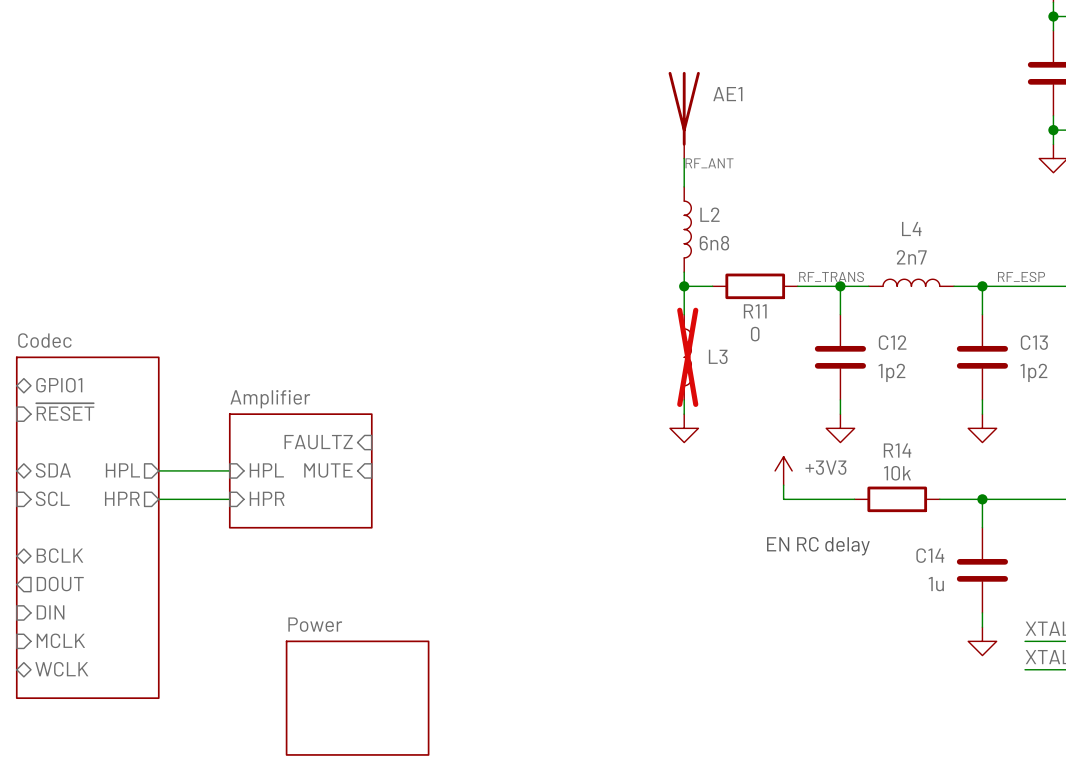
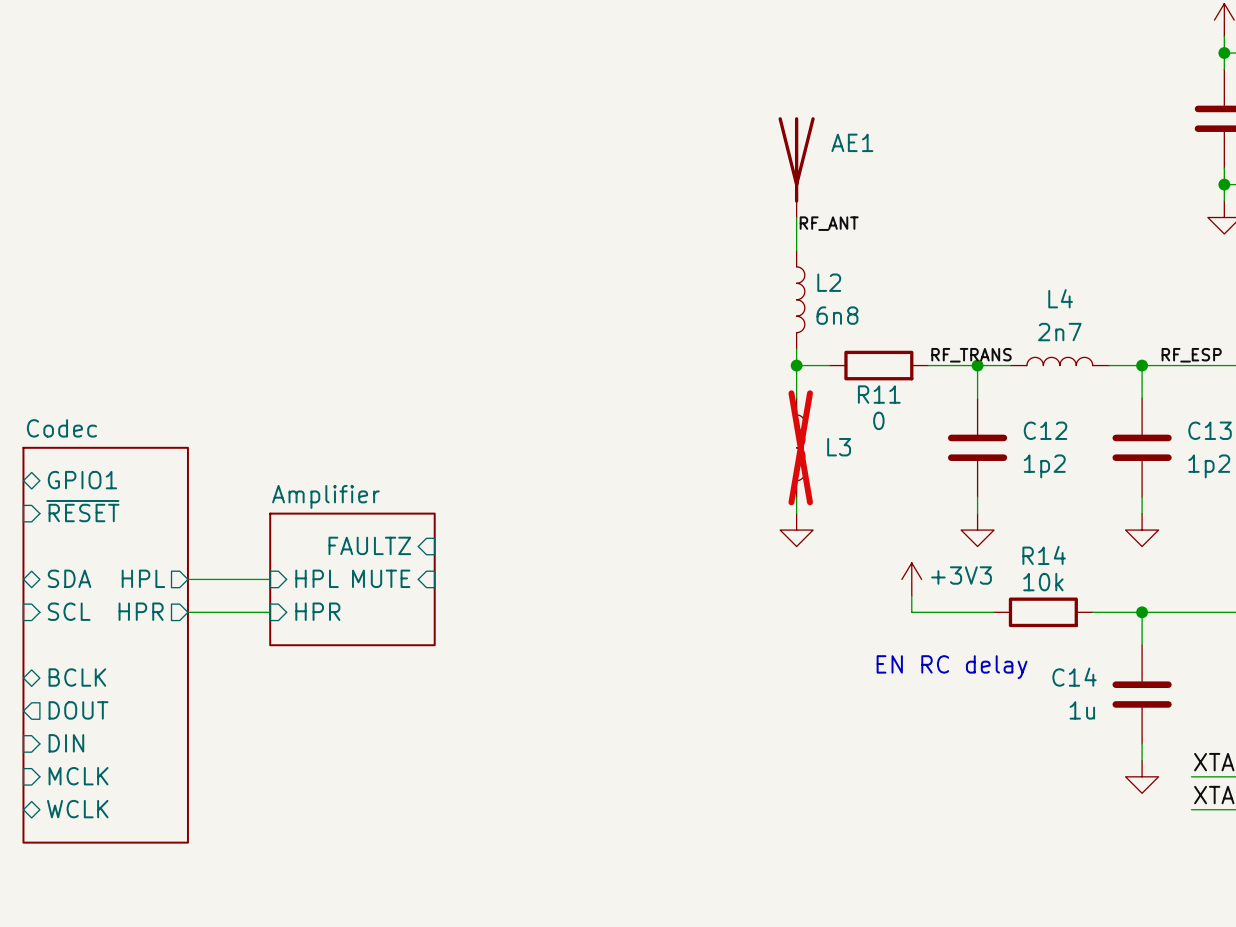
sheet Power: (357, 698) -> none

